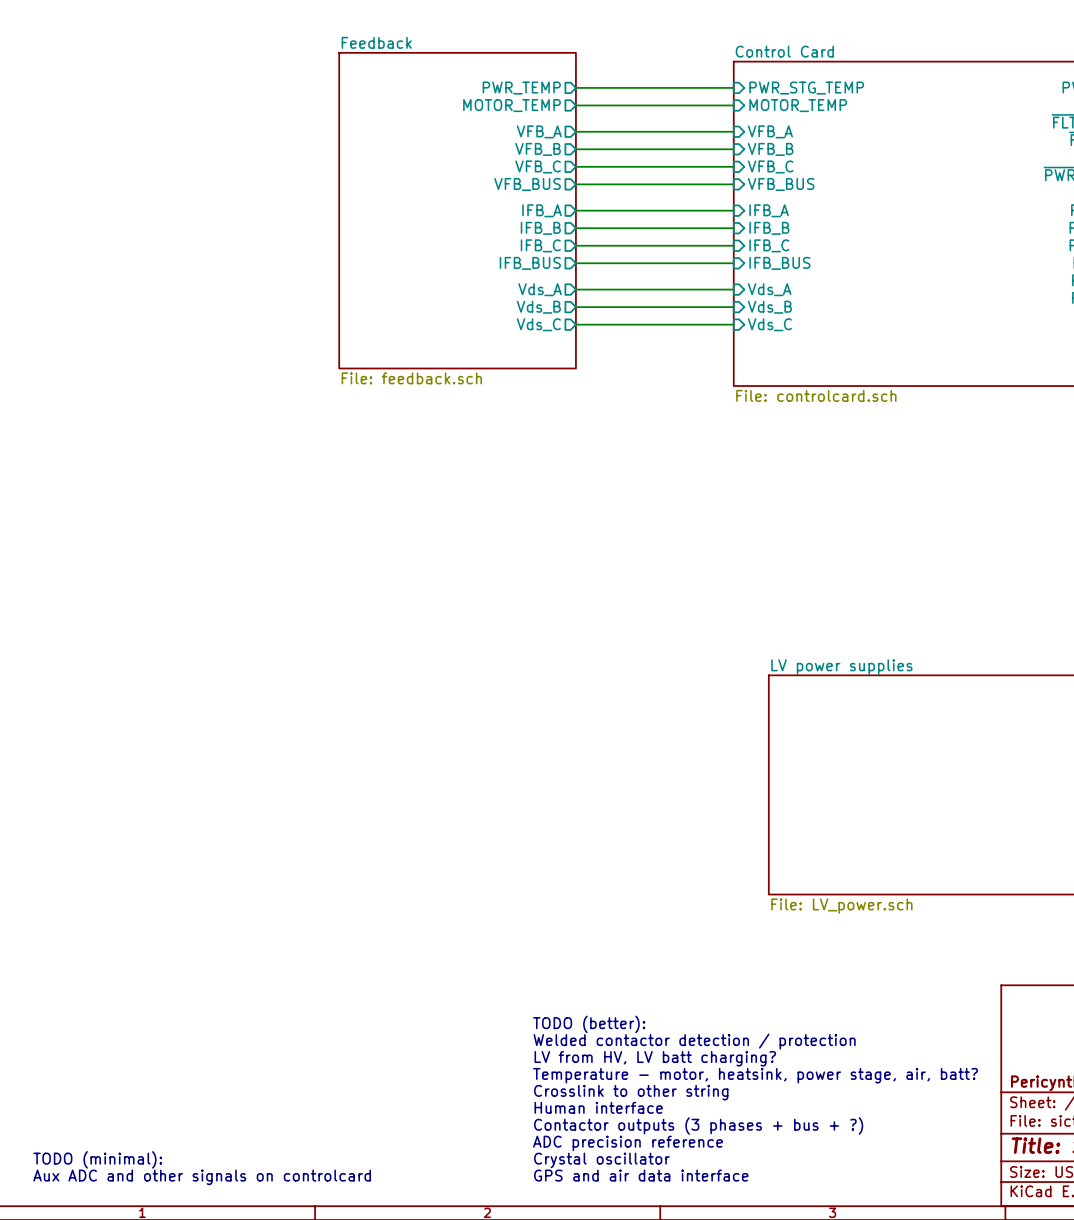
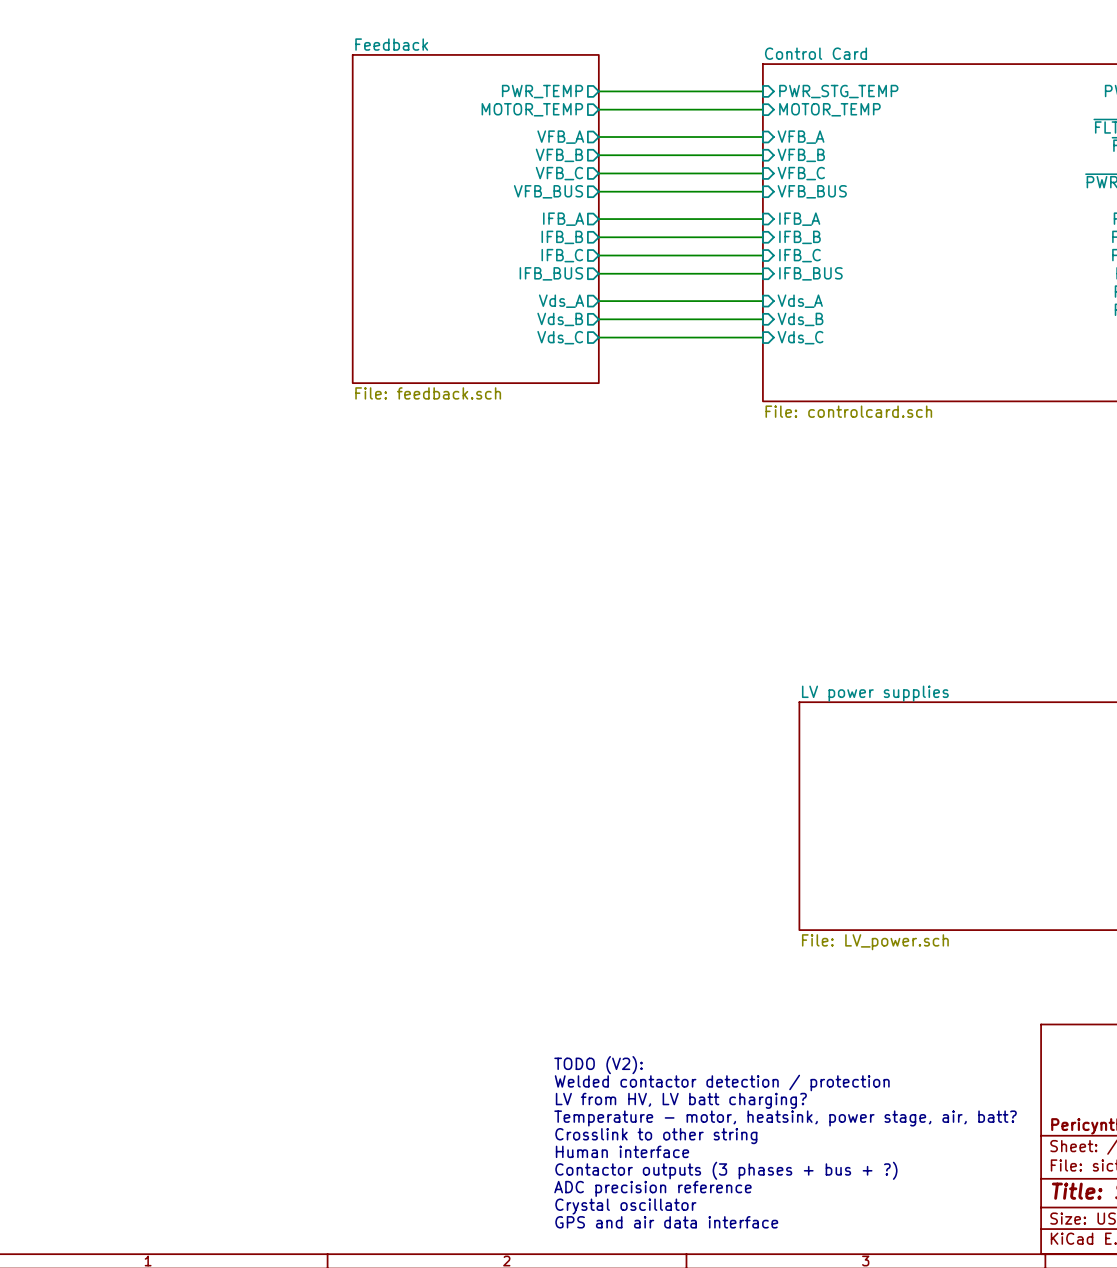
text: TODO (better): (589, 1024) -> TODO (V2): (598, 1065)
text: TODO (minimal): (97, 1159) -> none
text: Aux ADC and other signals on controlcard (202, 1177) -> none

